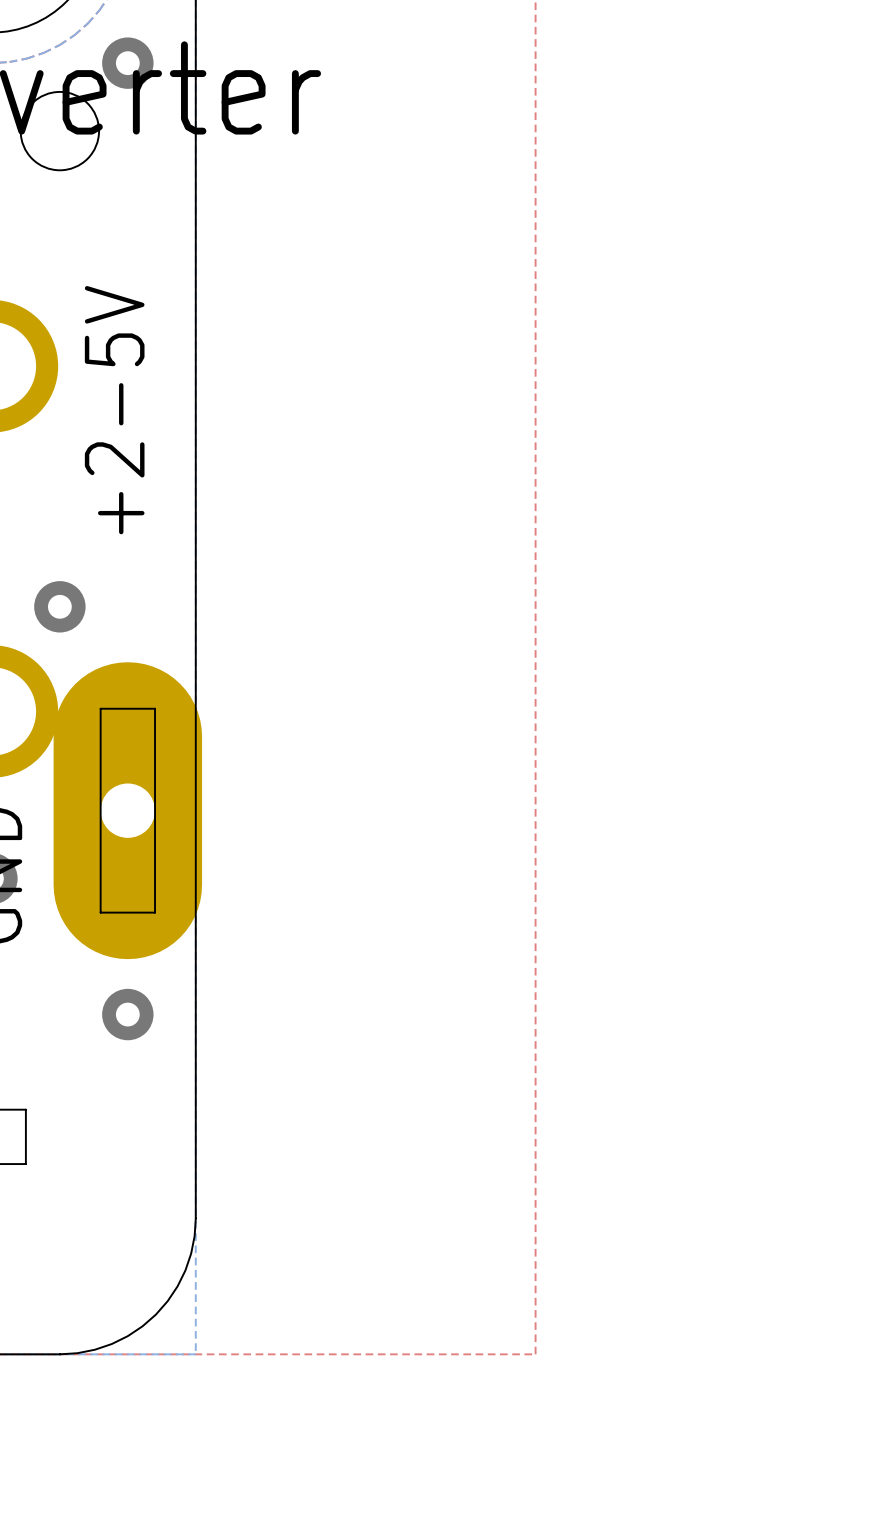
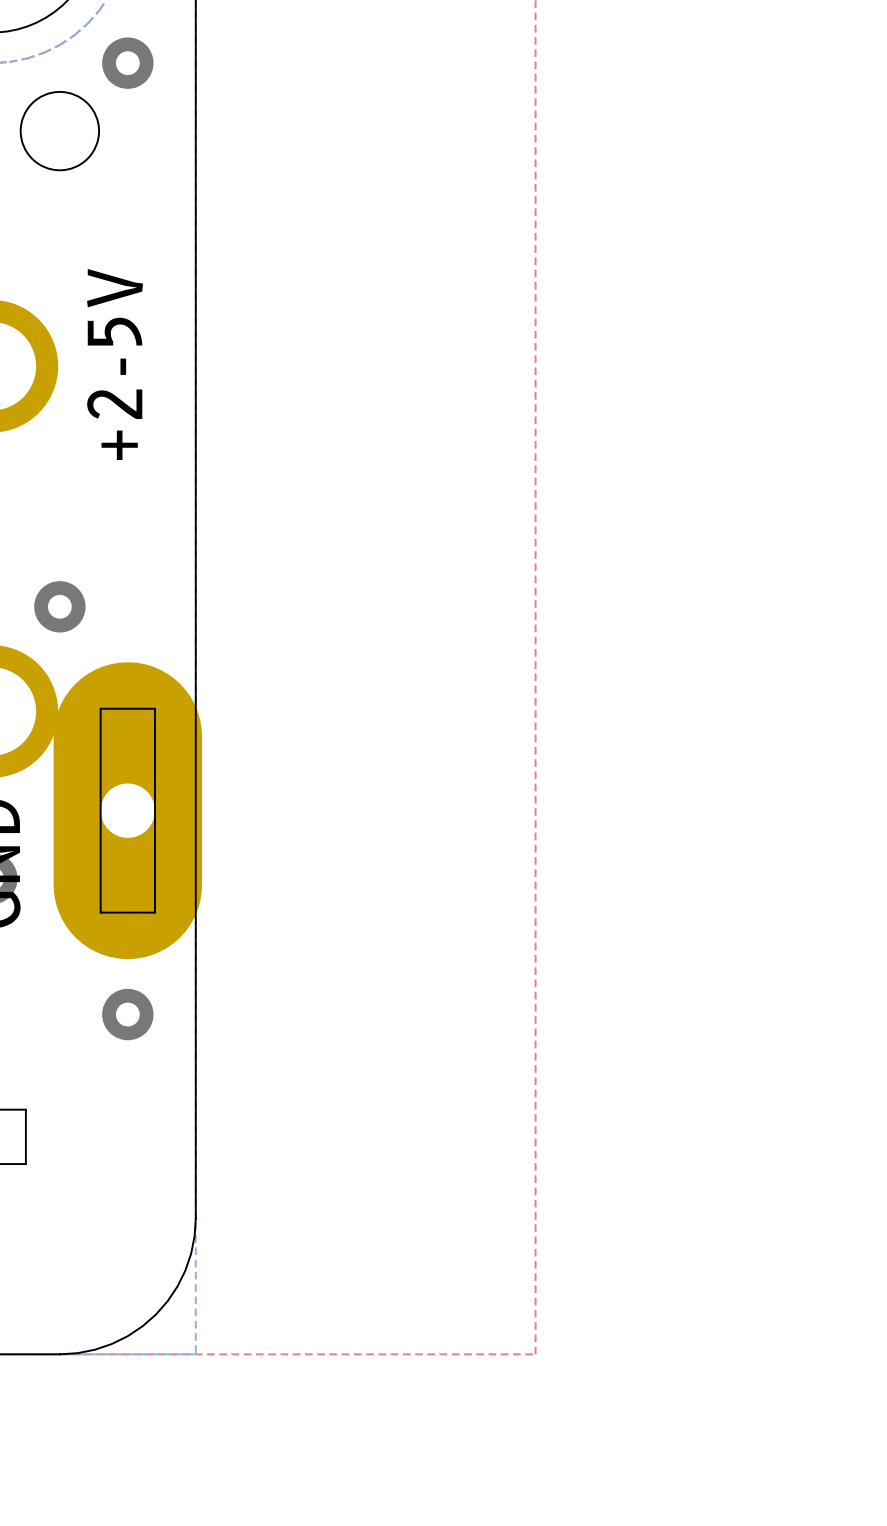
text position: +2-5V (114, 410) -> +2-5V (115, 364)

